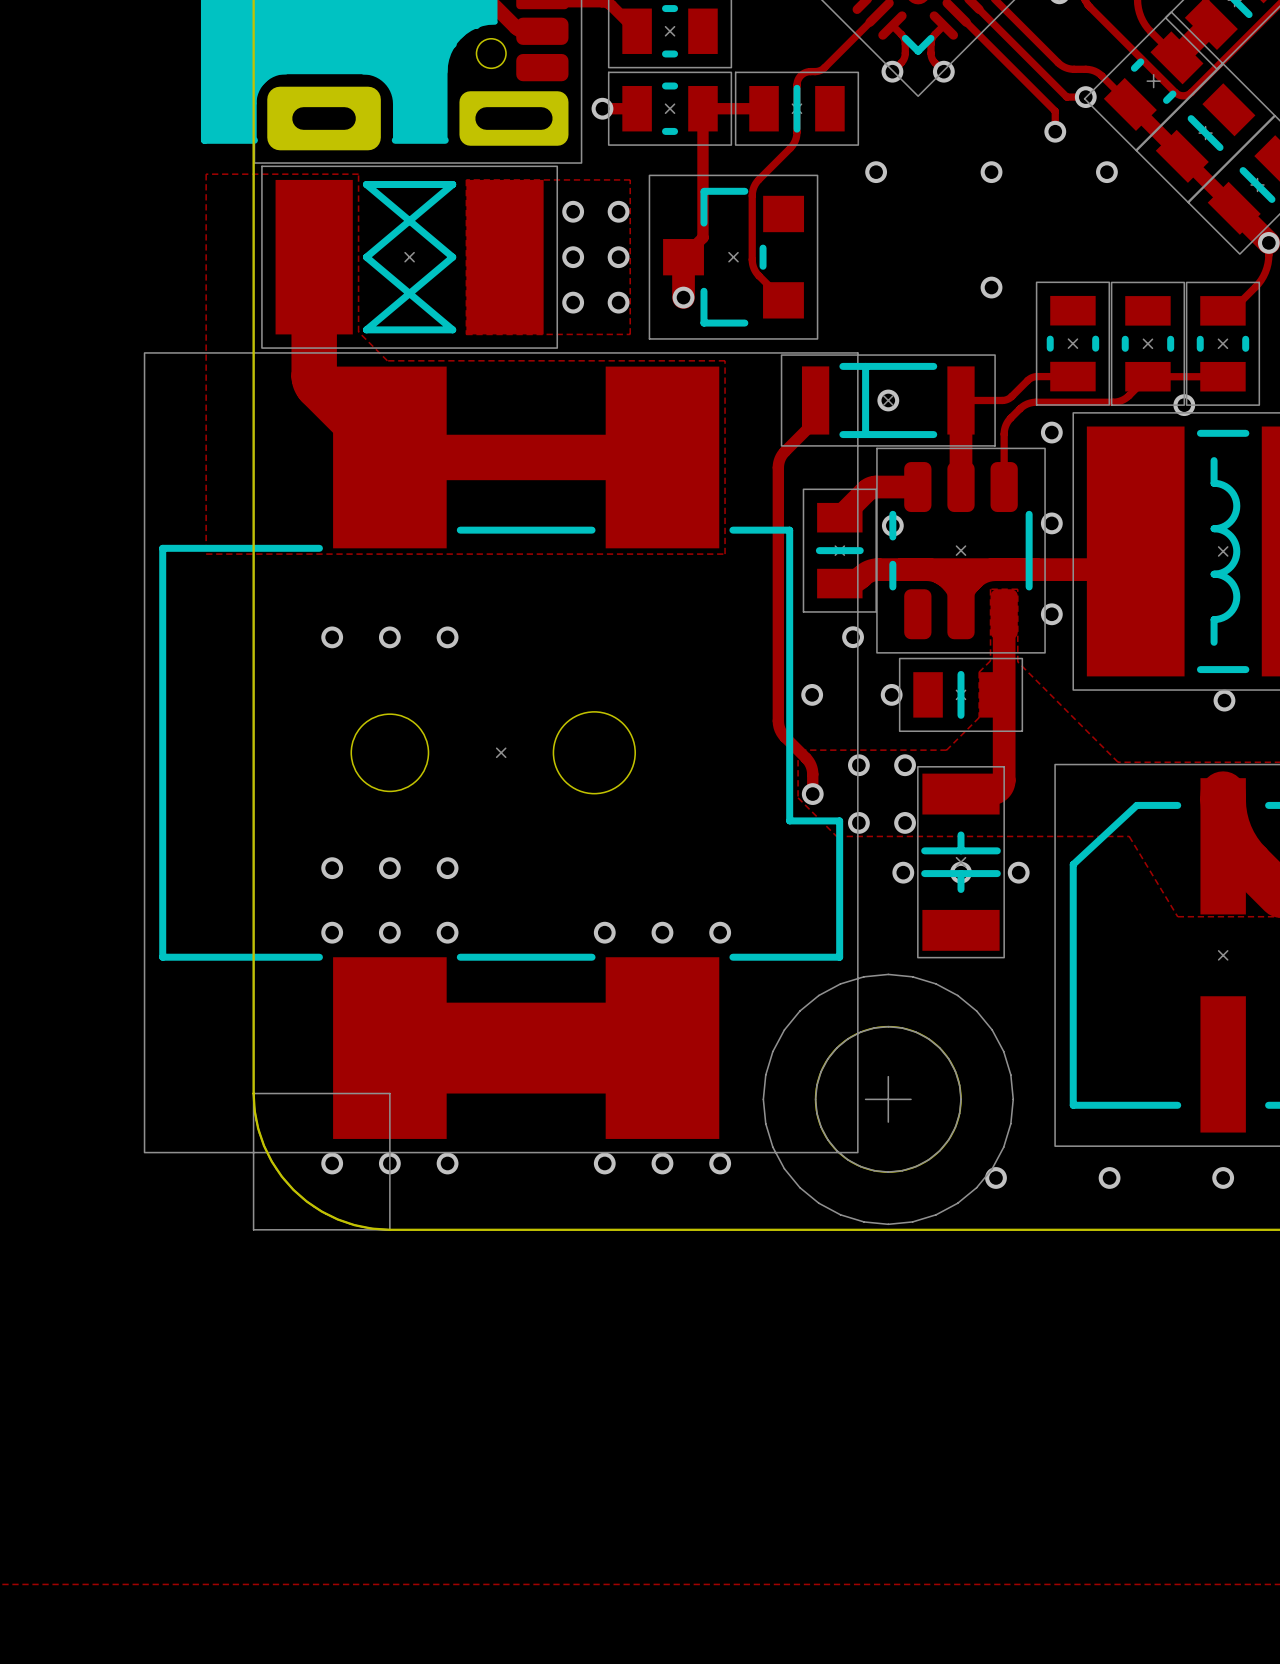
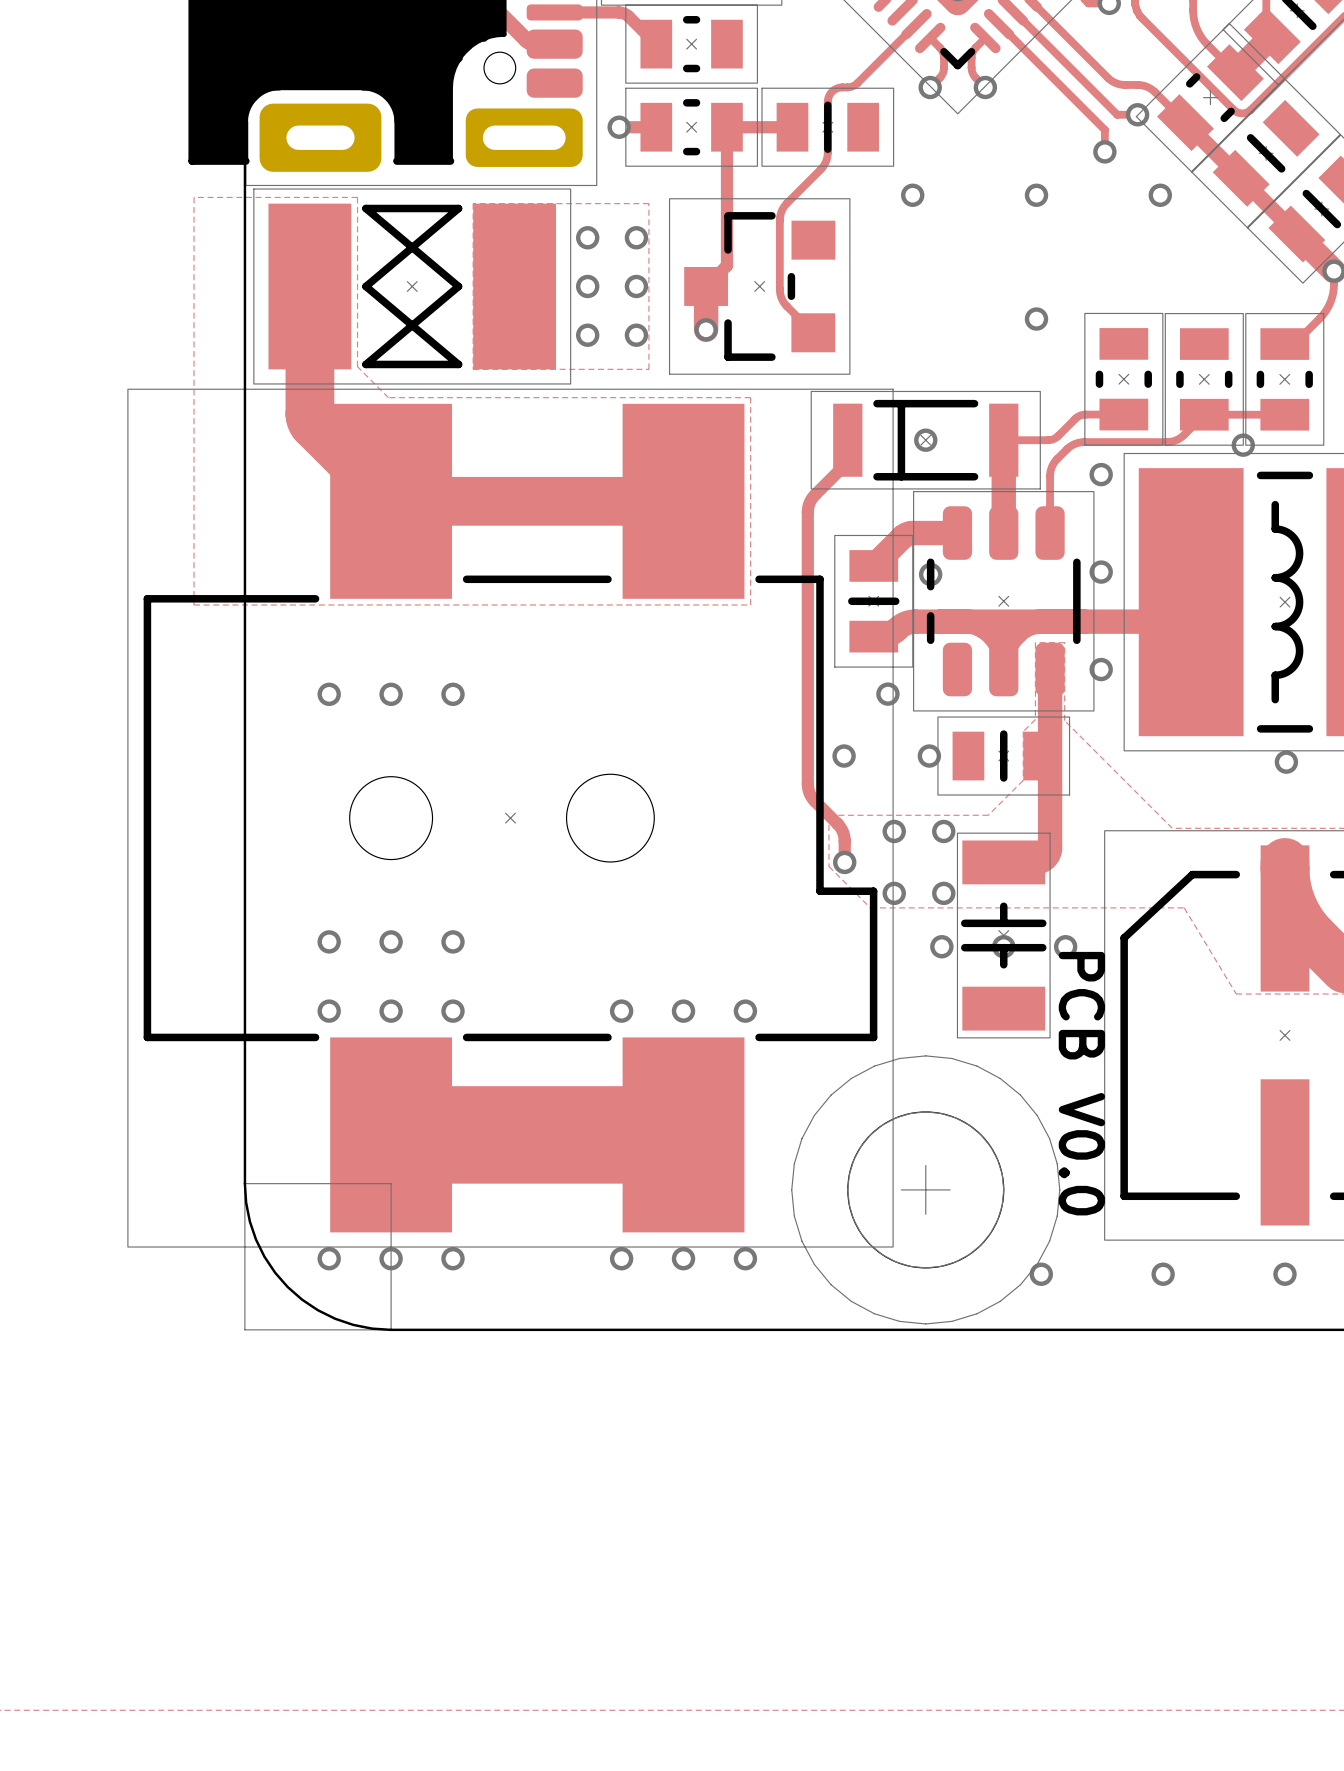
text: none -> PCB V0.0 (1081, 1083)

